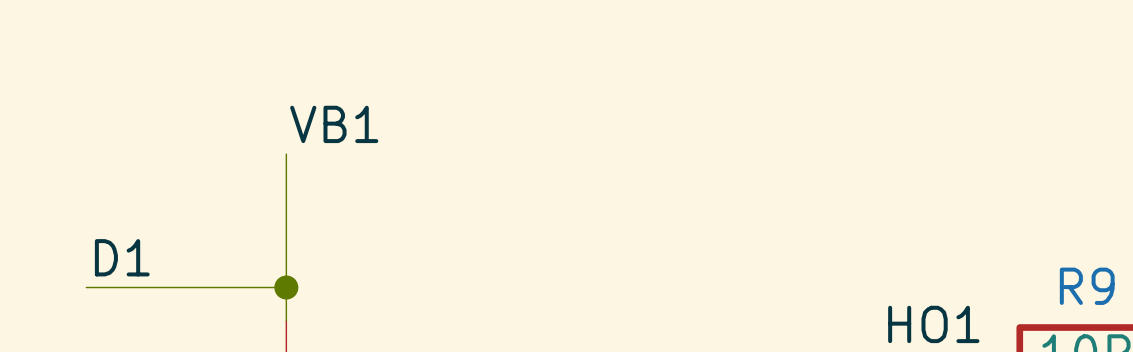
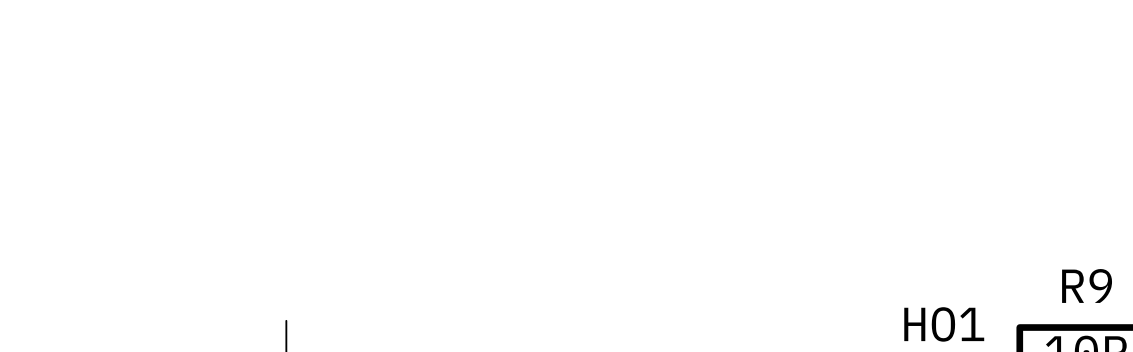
label: VB1 (334, 124) -> none
wire: (286, 154) (286, 320) -> none
label: D1 (122, 257) -> none
wire: (86, 287) (286, 287) -> none
junction: (286, 287) -> none

